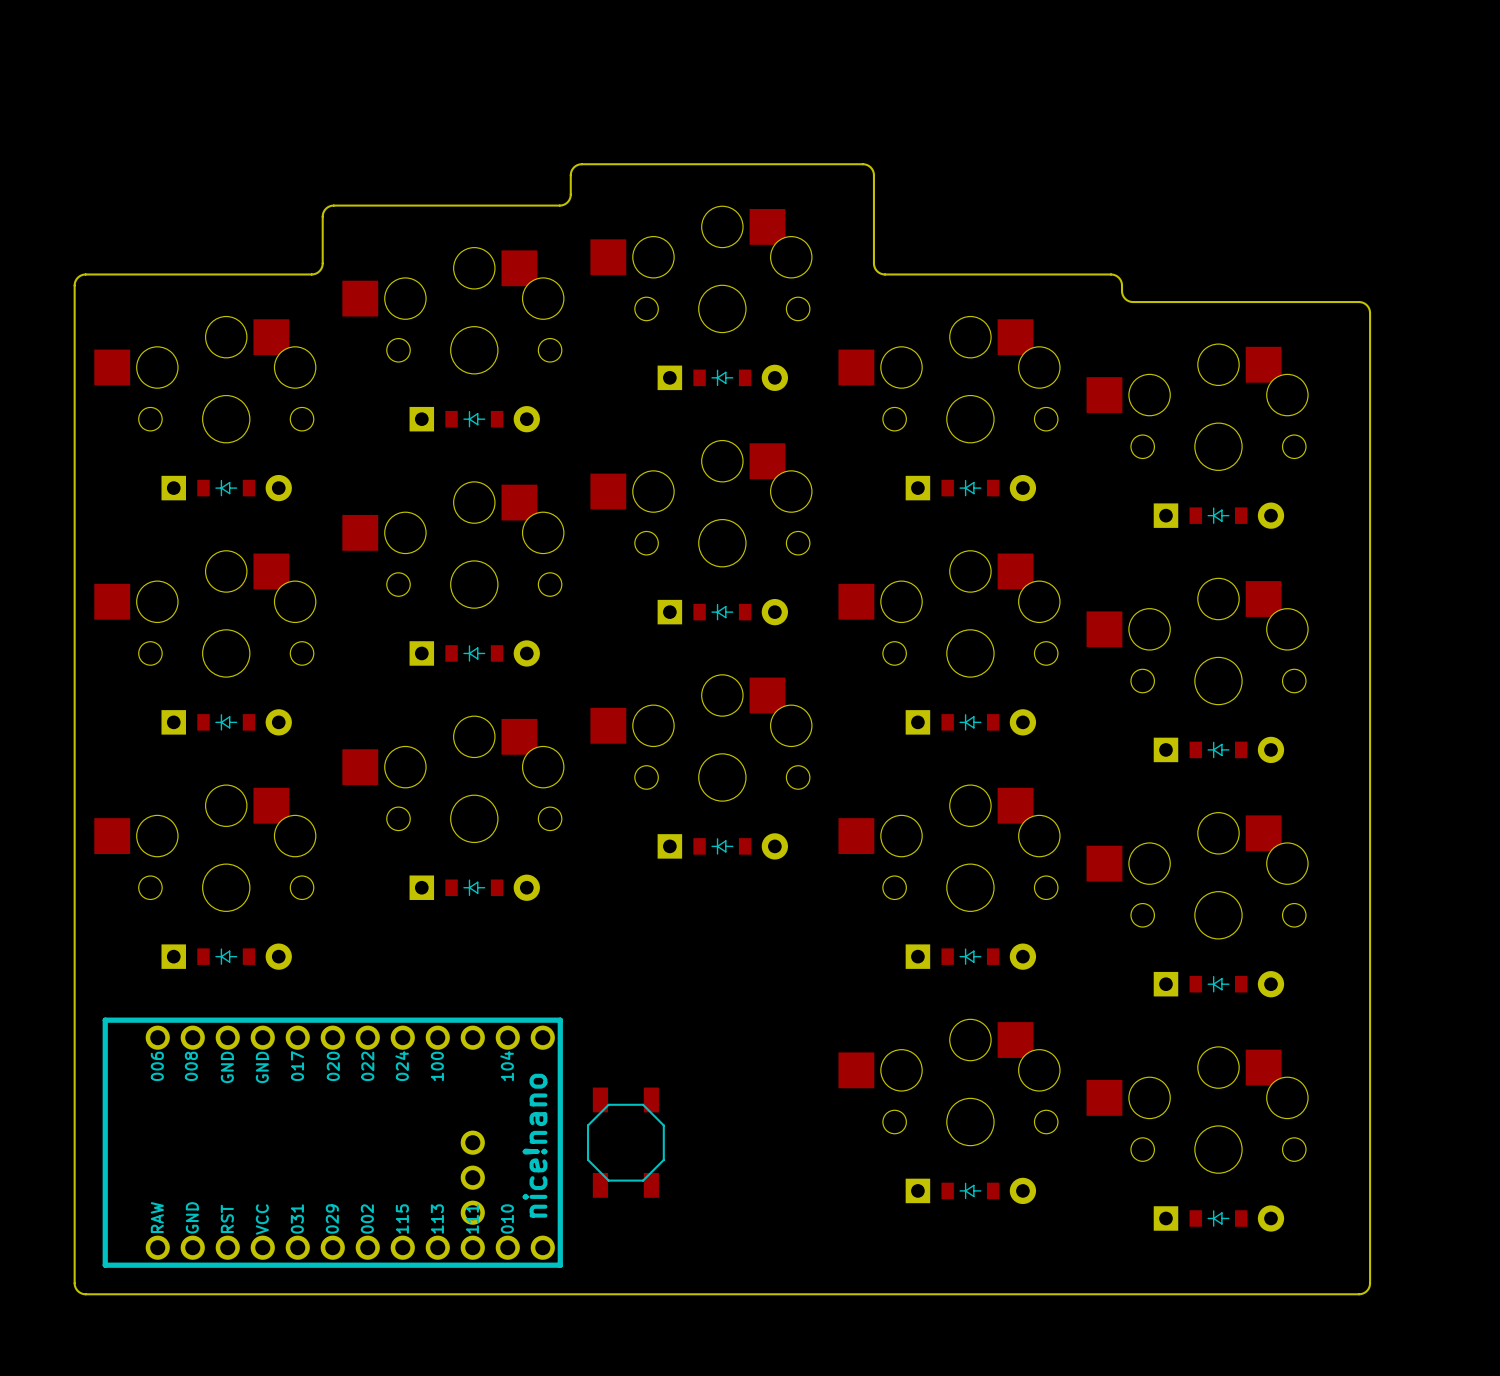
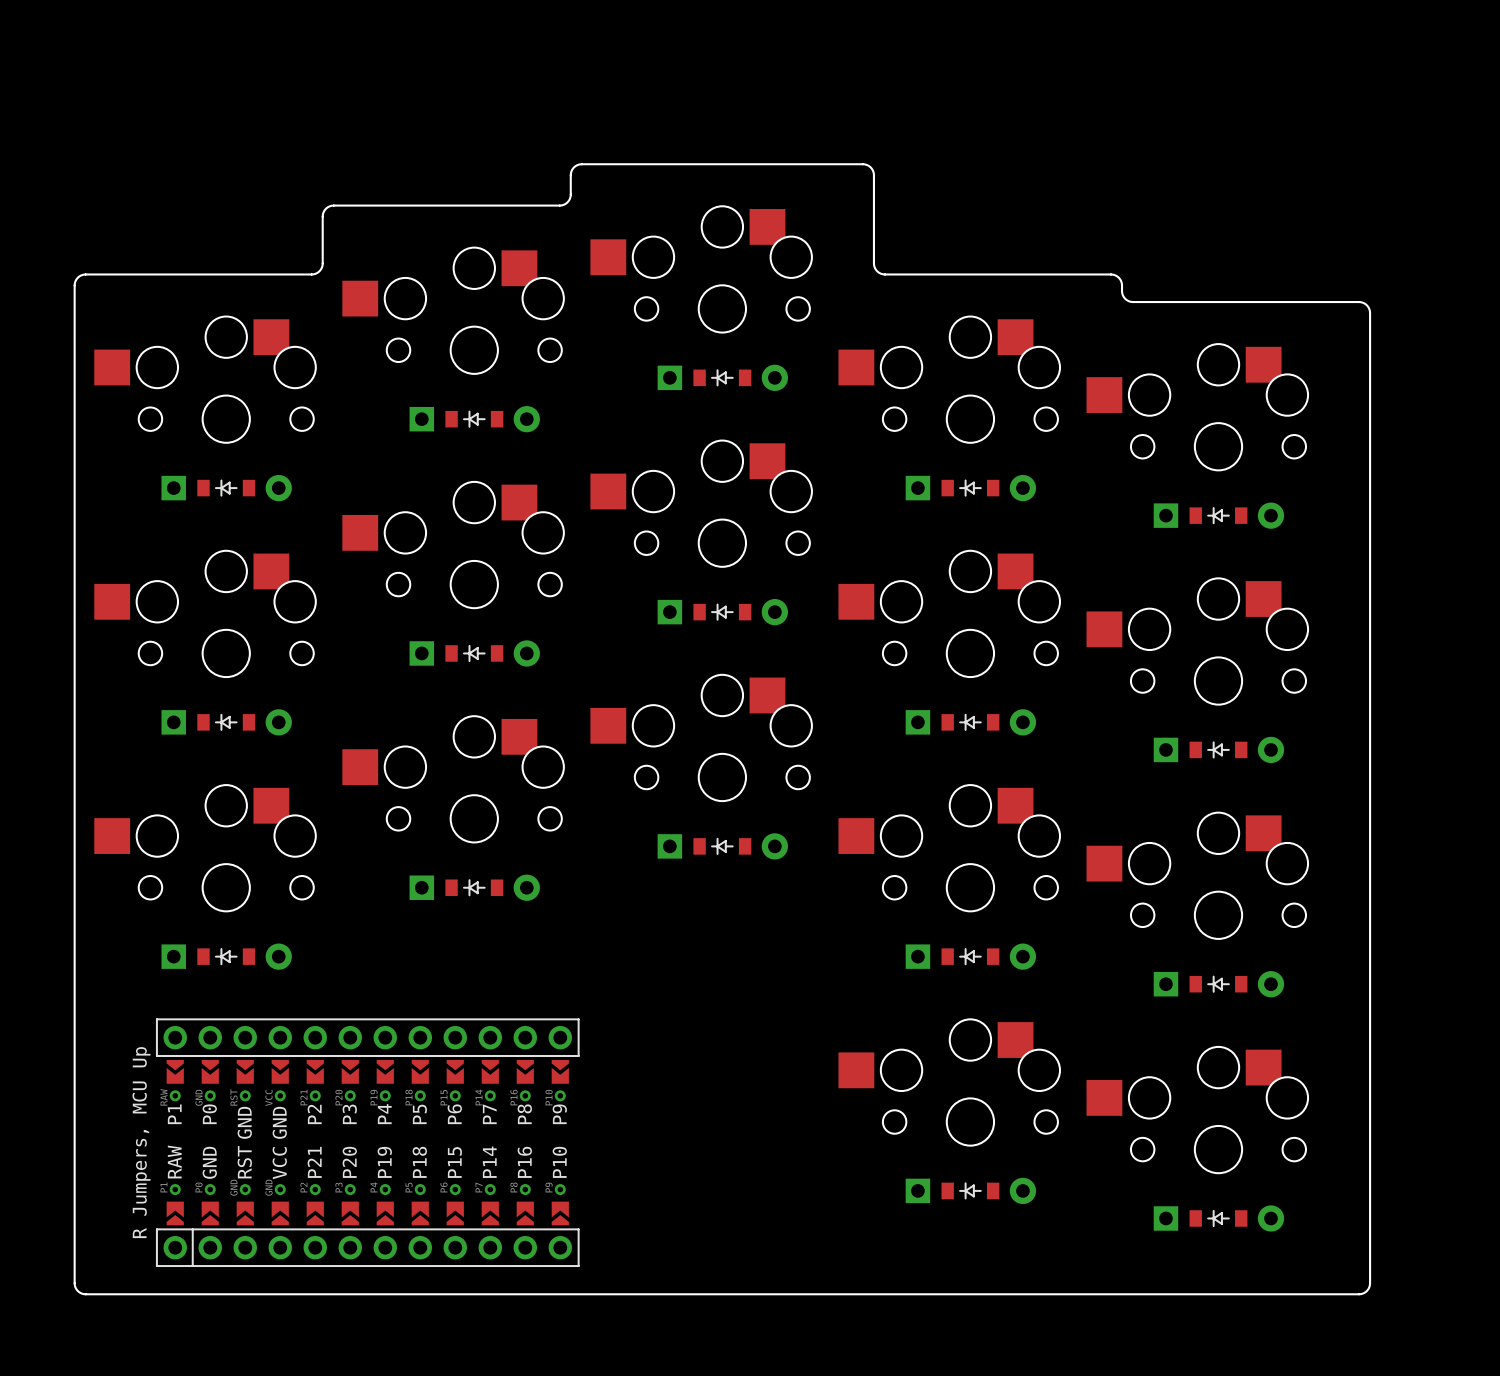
part: (332, 1142) -> none
part: none -> (367, 1142)
part: (625, 1142) -> none

